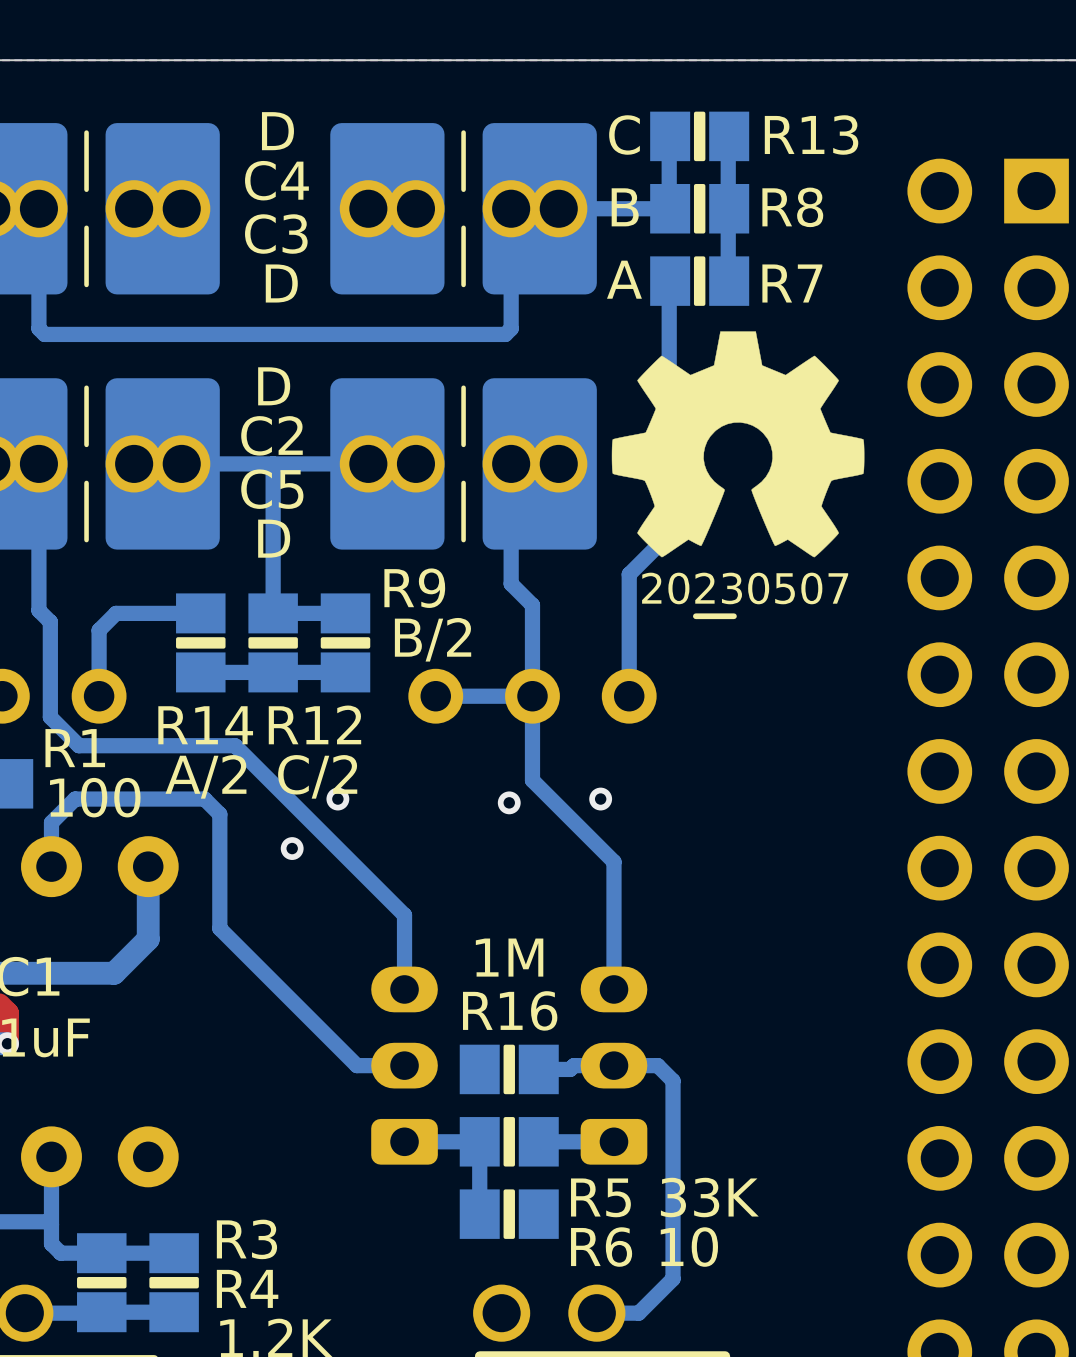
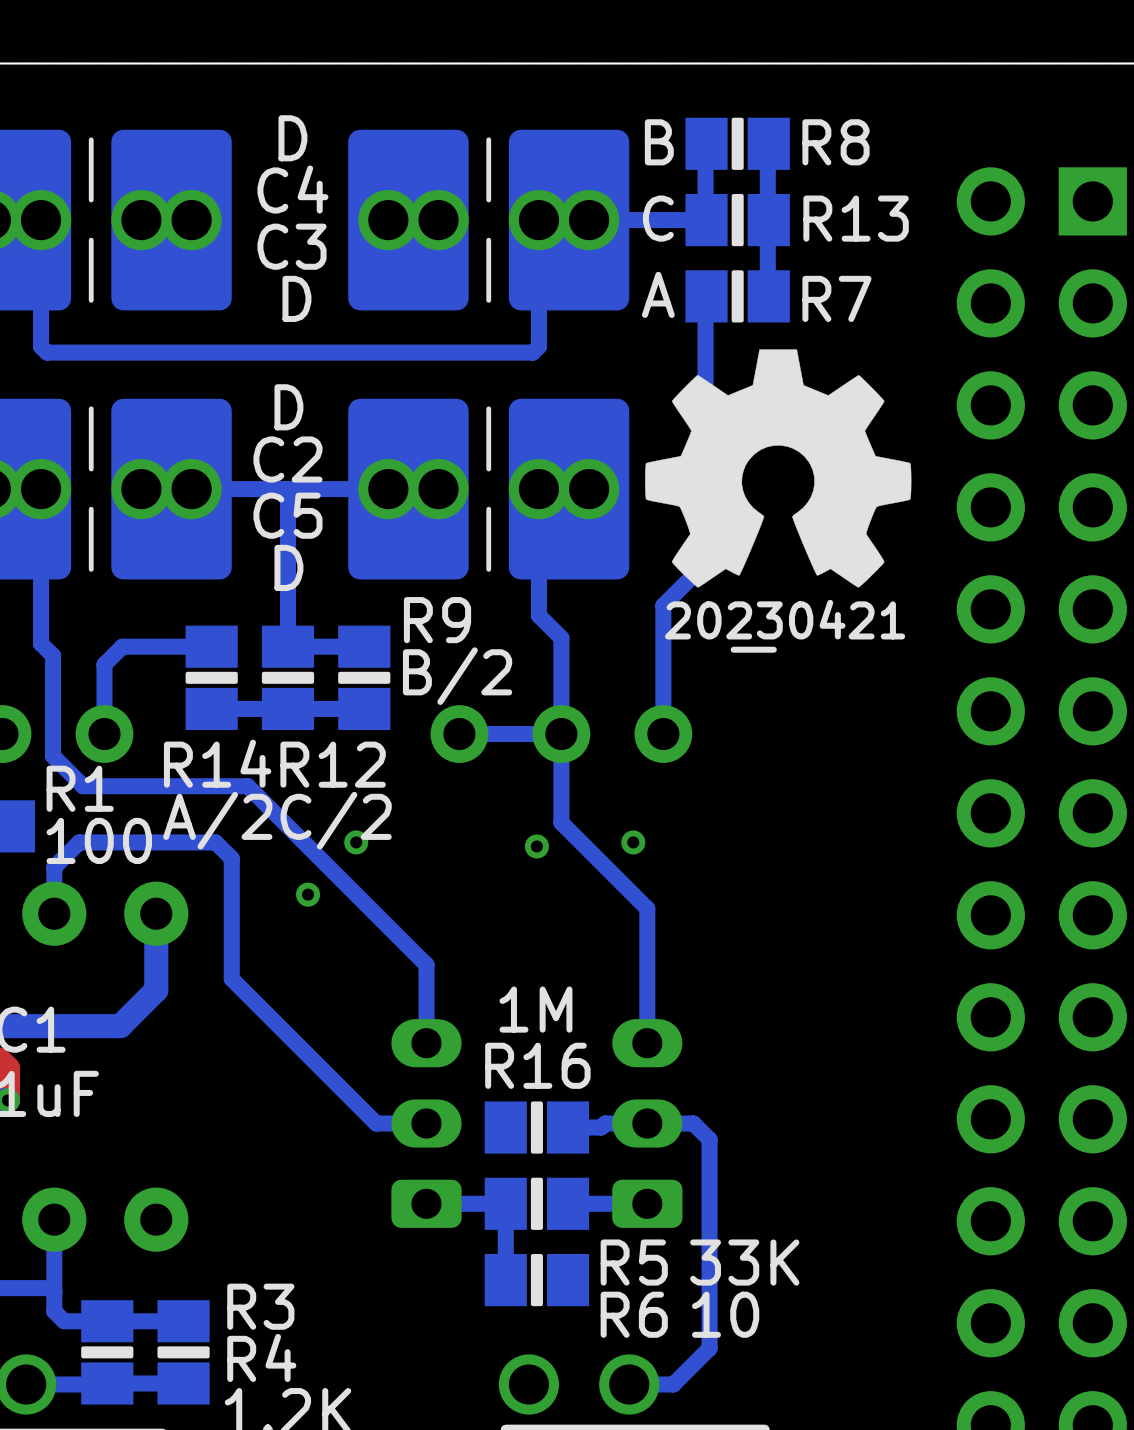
R13 value: C (624, 135) -> B (659, 142)
R13 name: R13 (811, 135) -> R8 (836, 142)
R8 value: B (625, 207) -> C (658, 218)
R8 name: R8 (792, 207) -> R13 (856, 218)
drawing shape: [642, 572, 849, 620] -> [665, 599, 906, 653]

